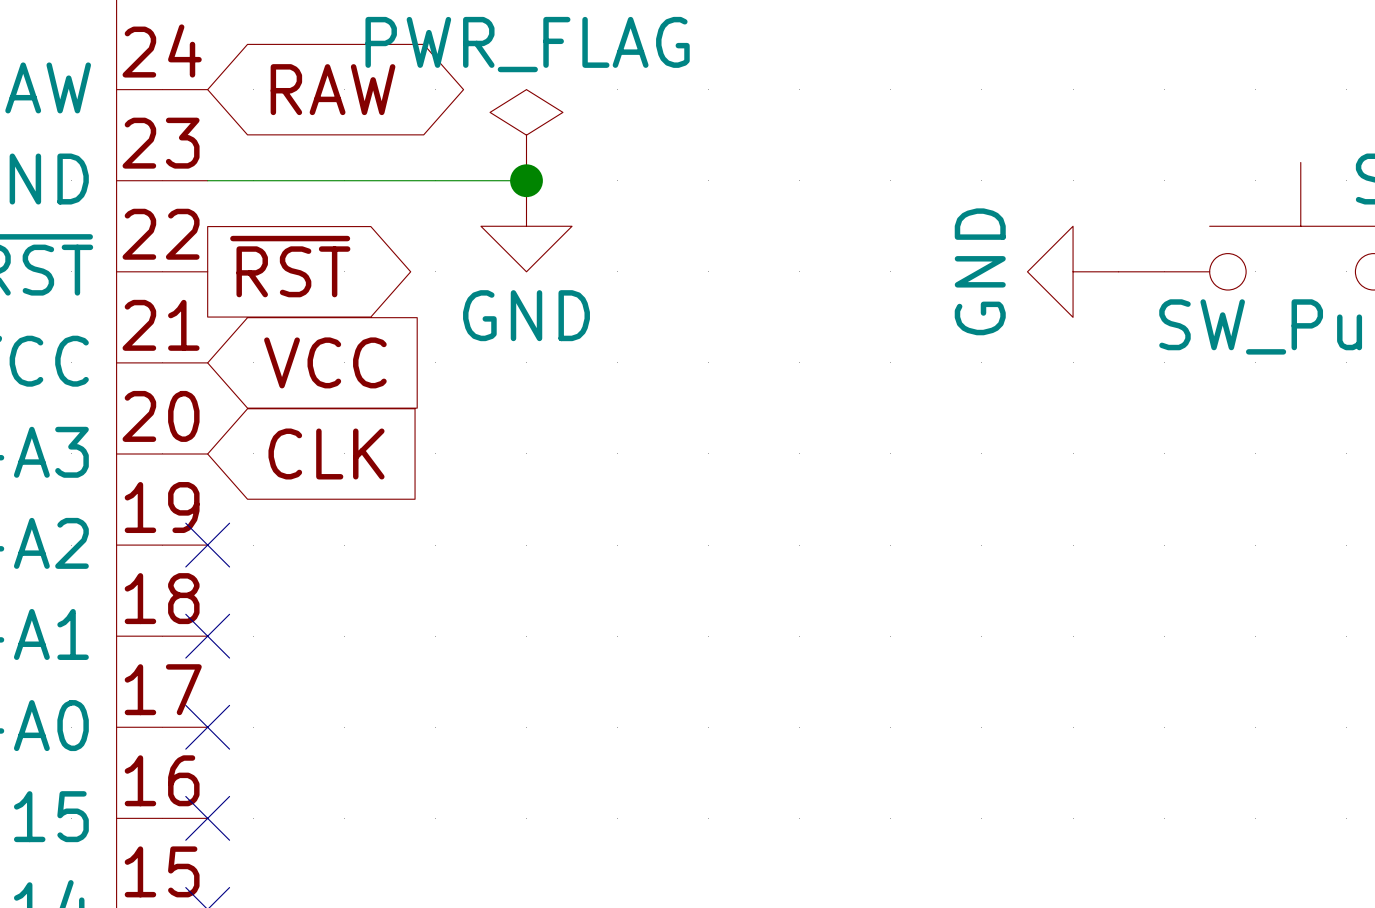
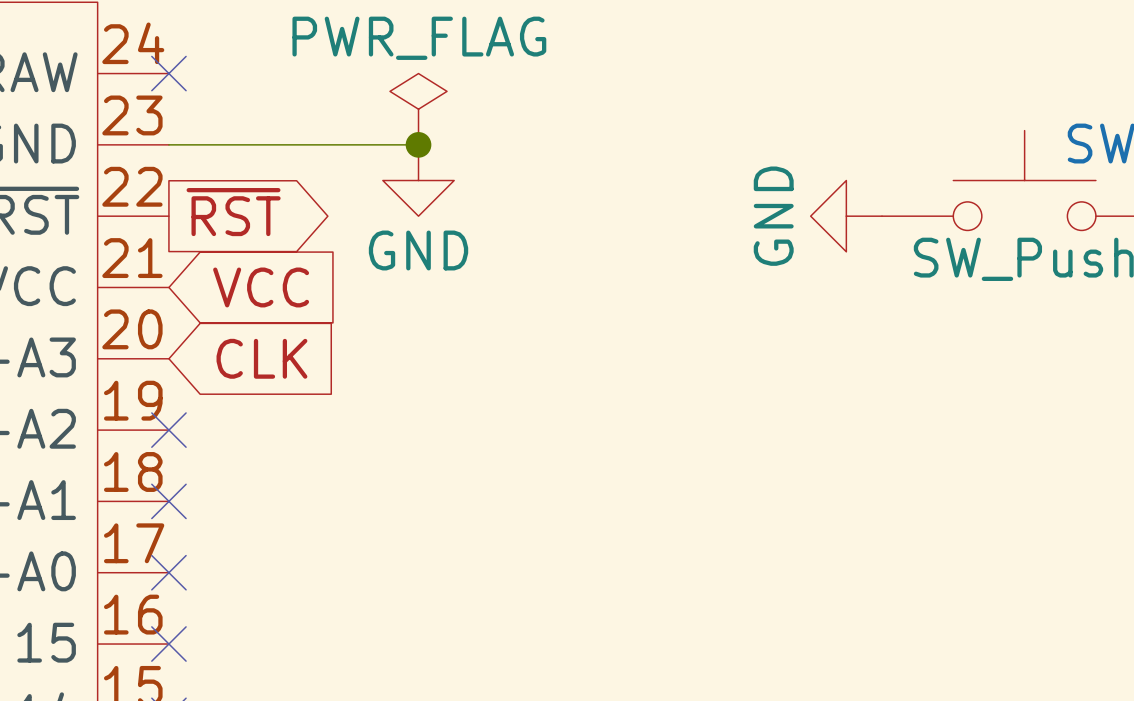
no-connect mark: none -> (168, 73)
global label: RAW (333, 89) -> none

